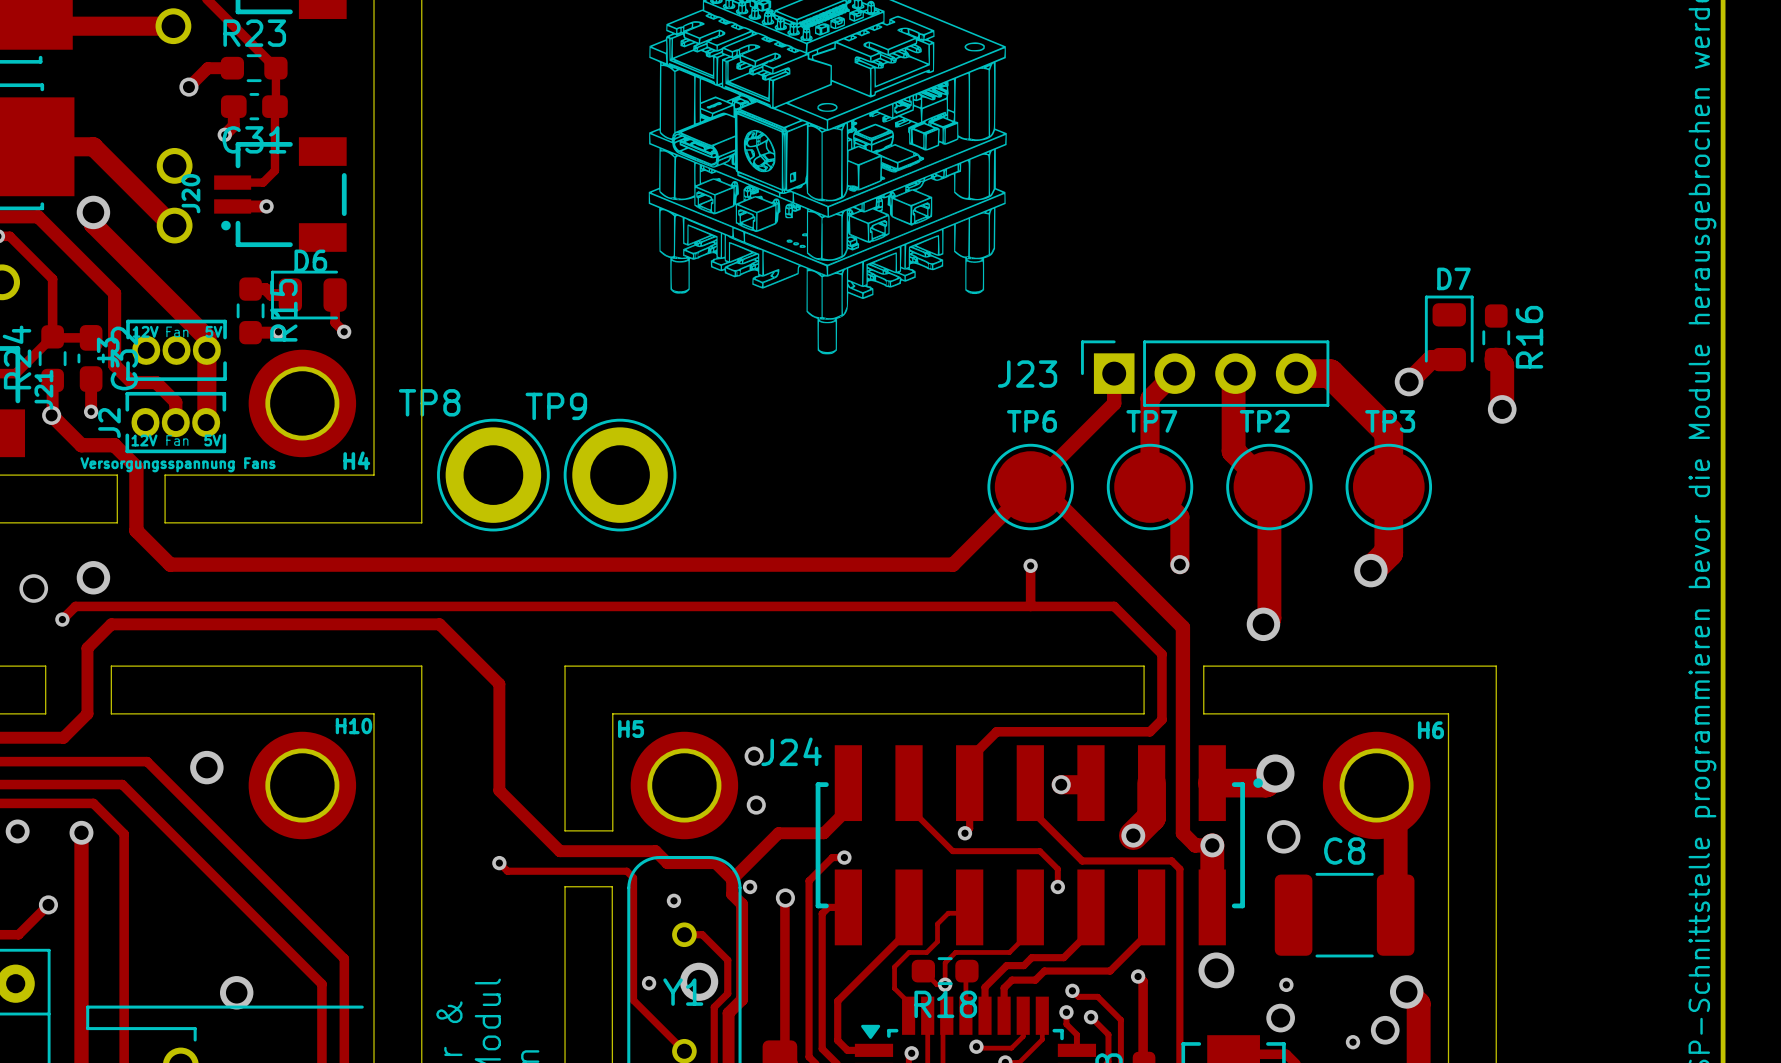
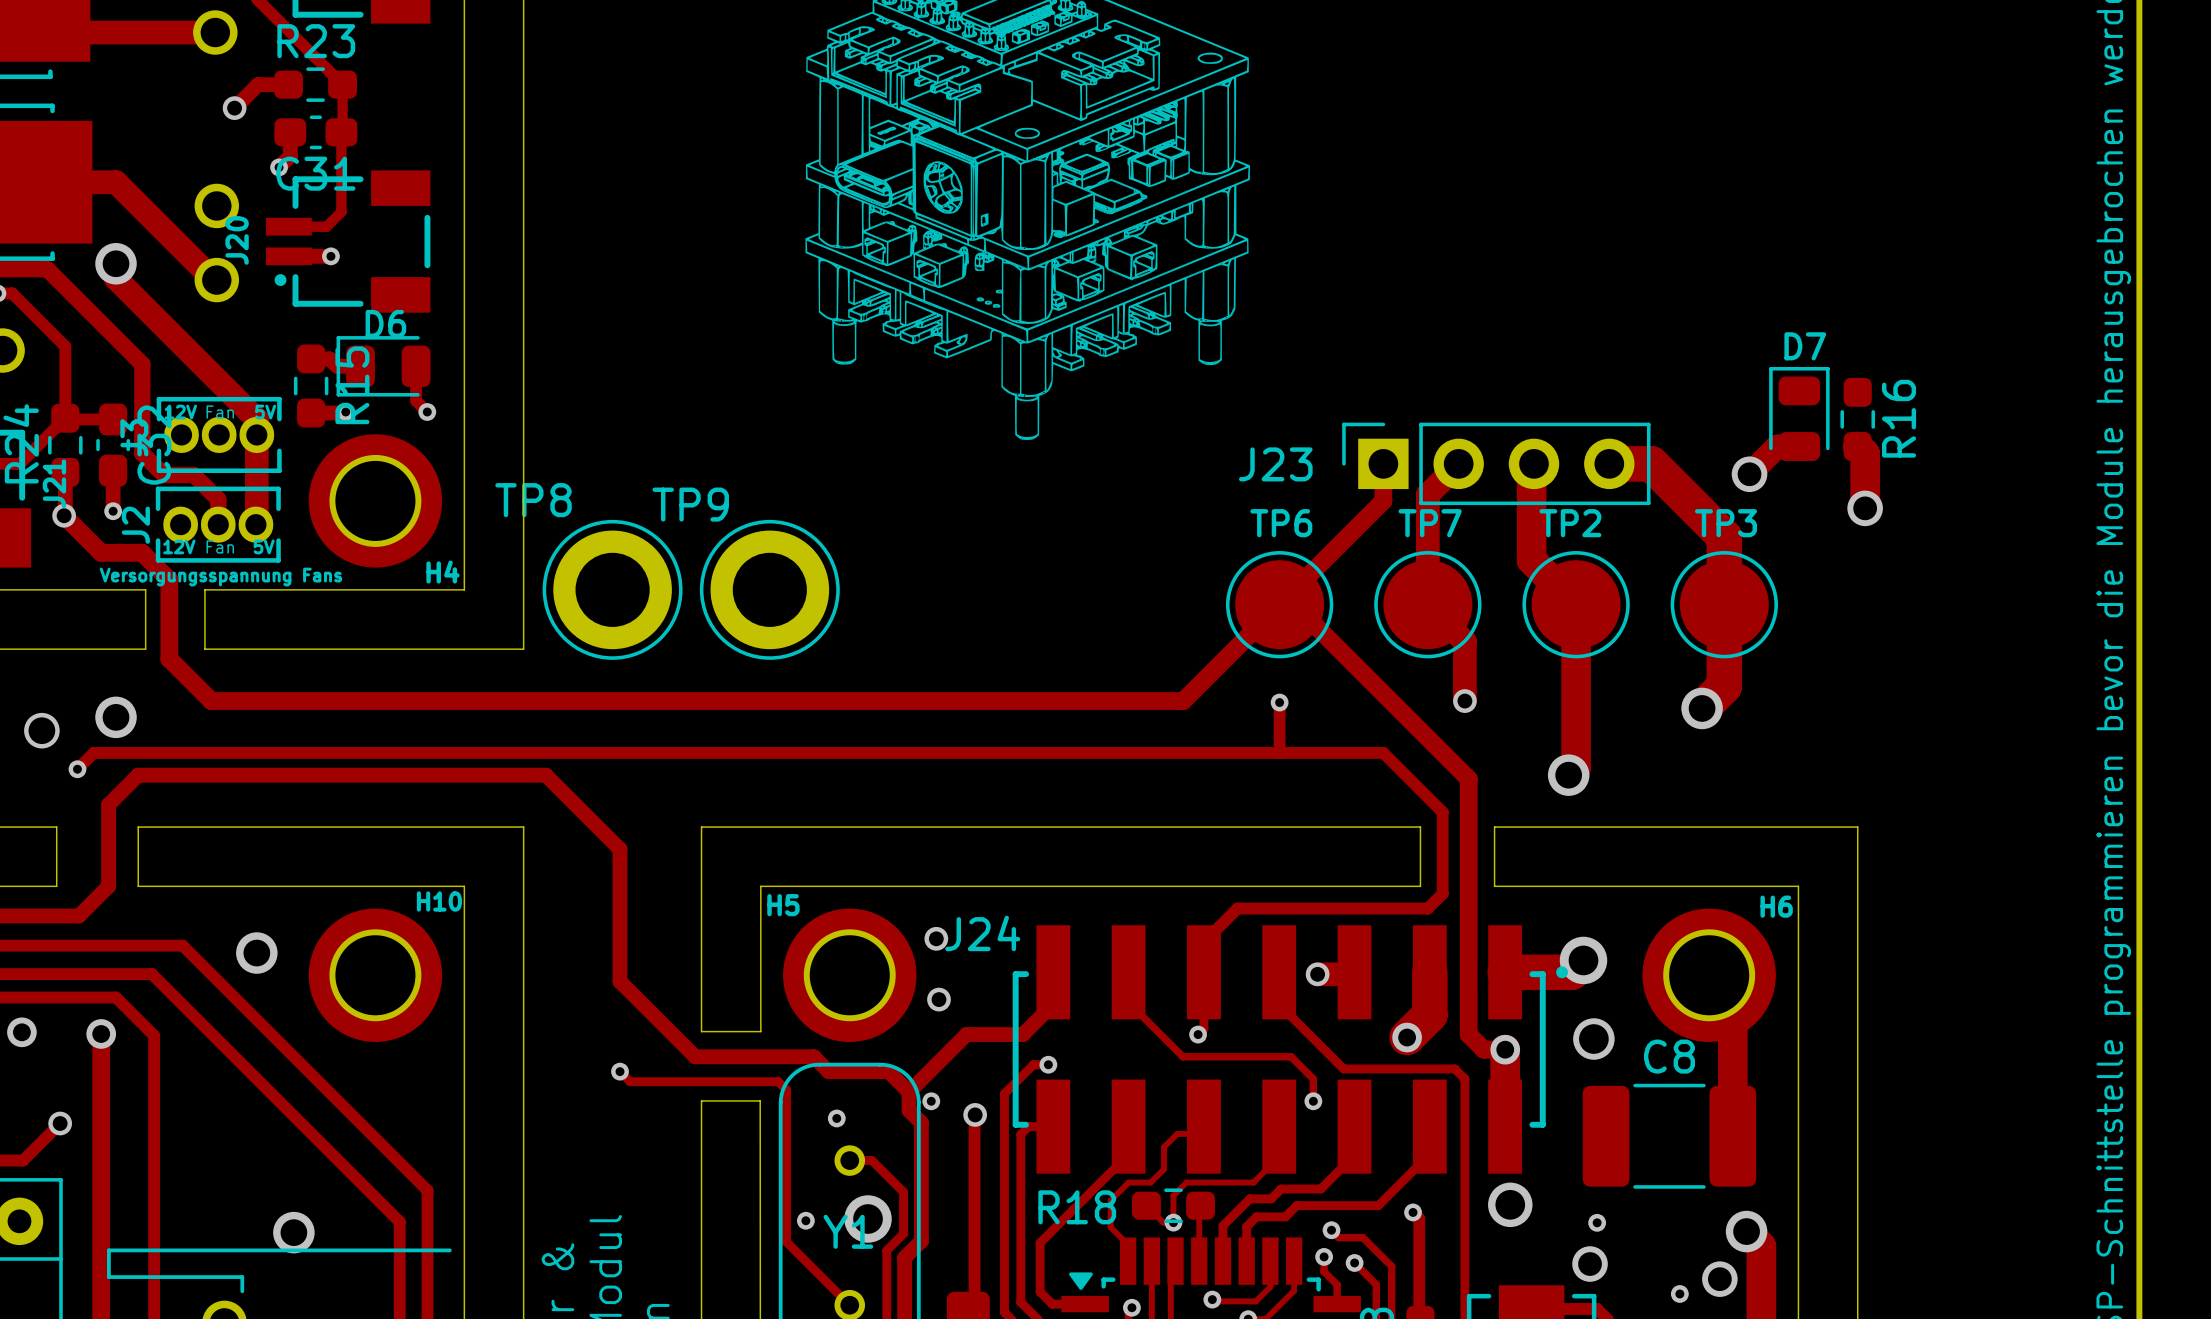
R18 name position: R18 (945, 1004) -> R18 (1077, 1207)

